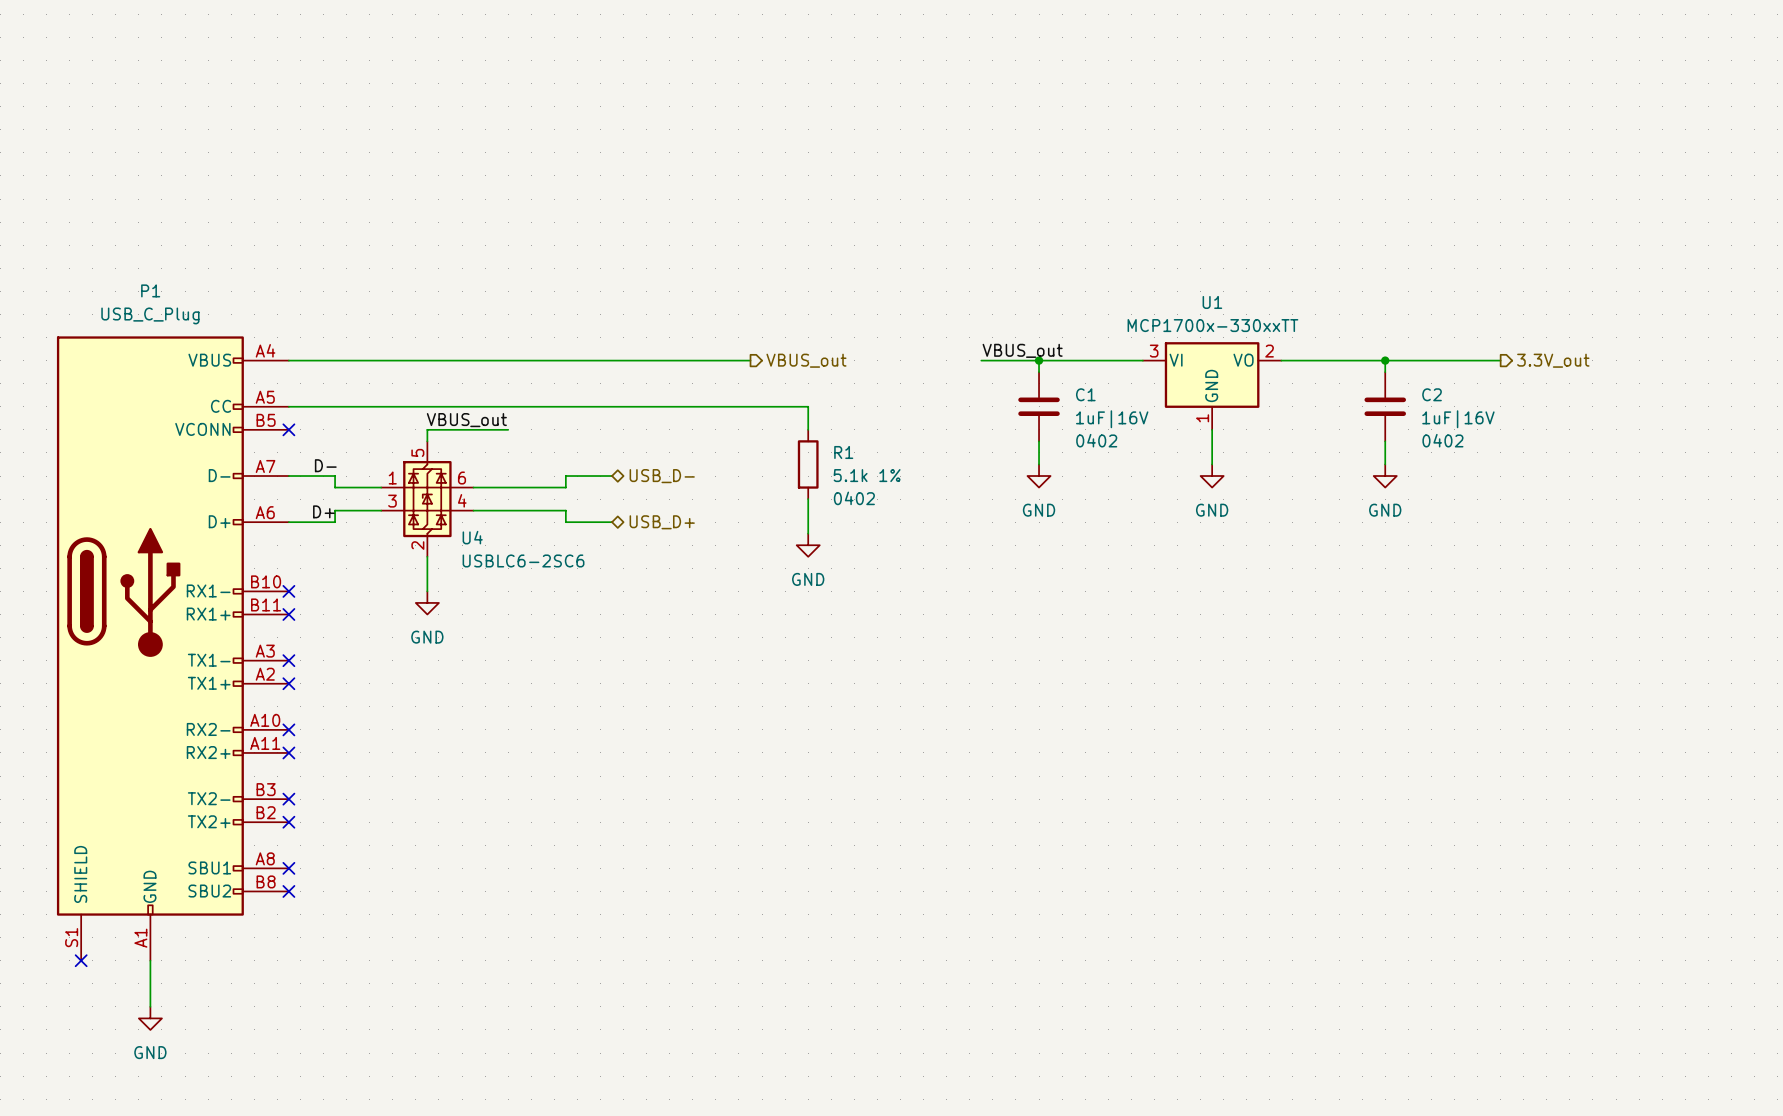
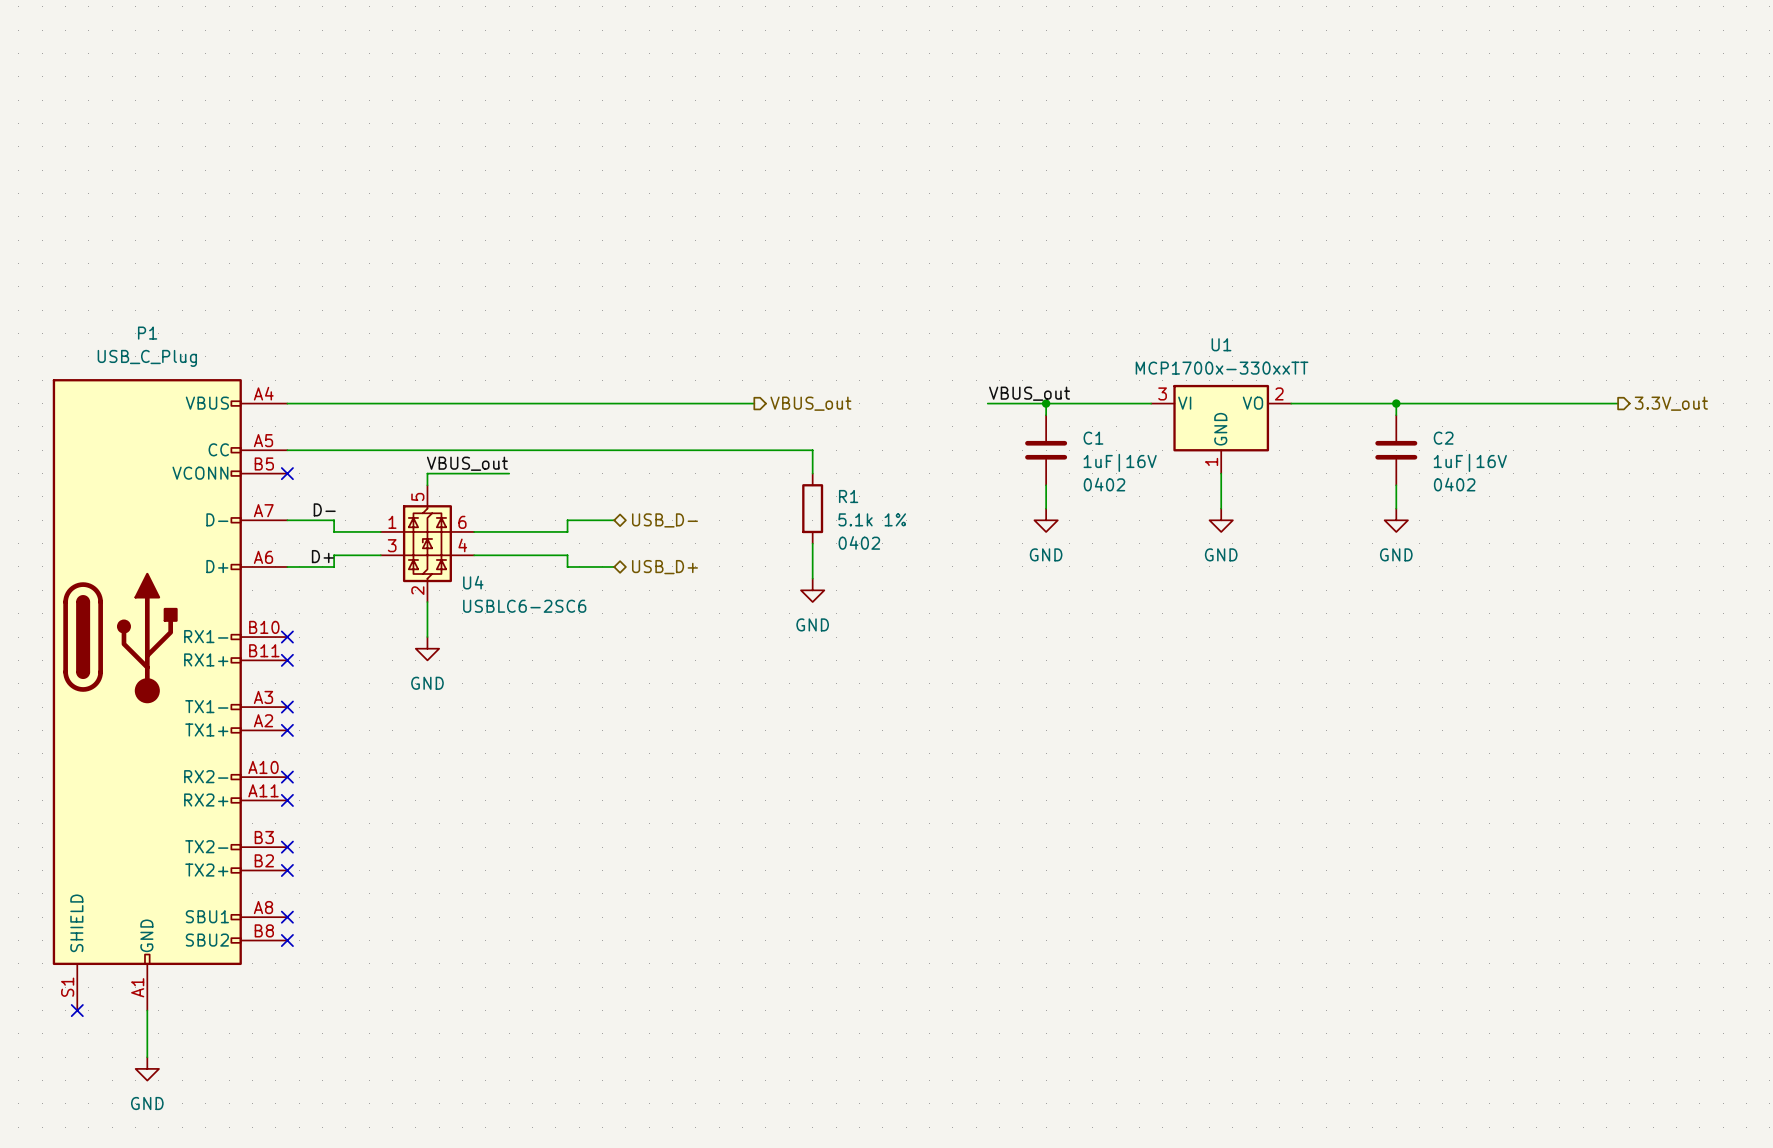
wire: none -> (1513, 403) (1618, 403)
hierarchical label position: 3.3V_out (1553, 360) -> 3.3V_out (1671, 403)

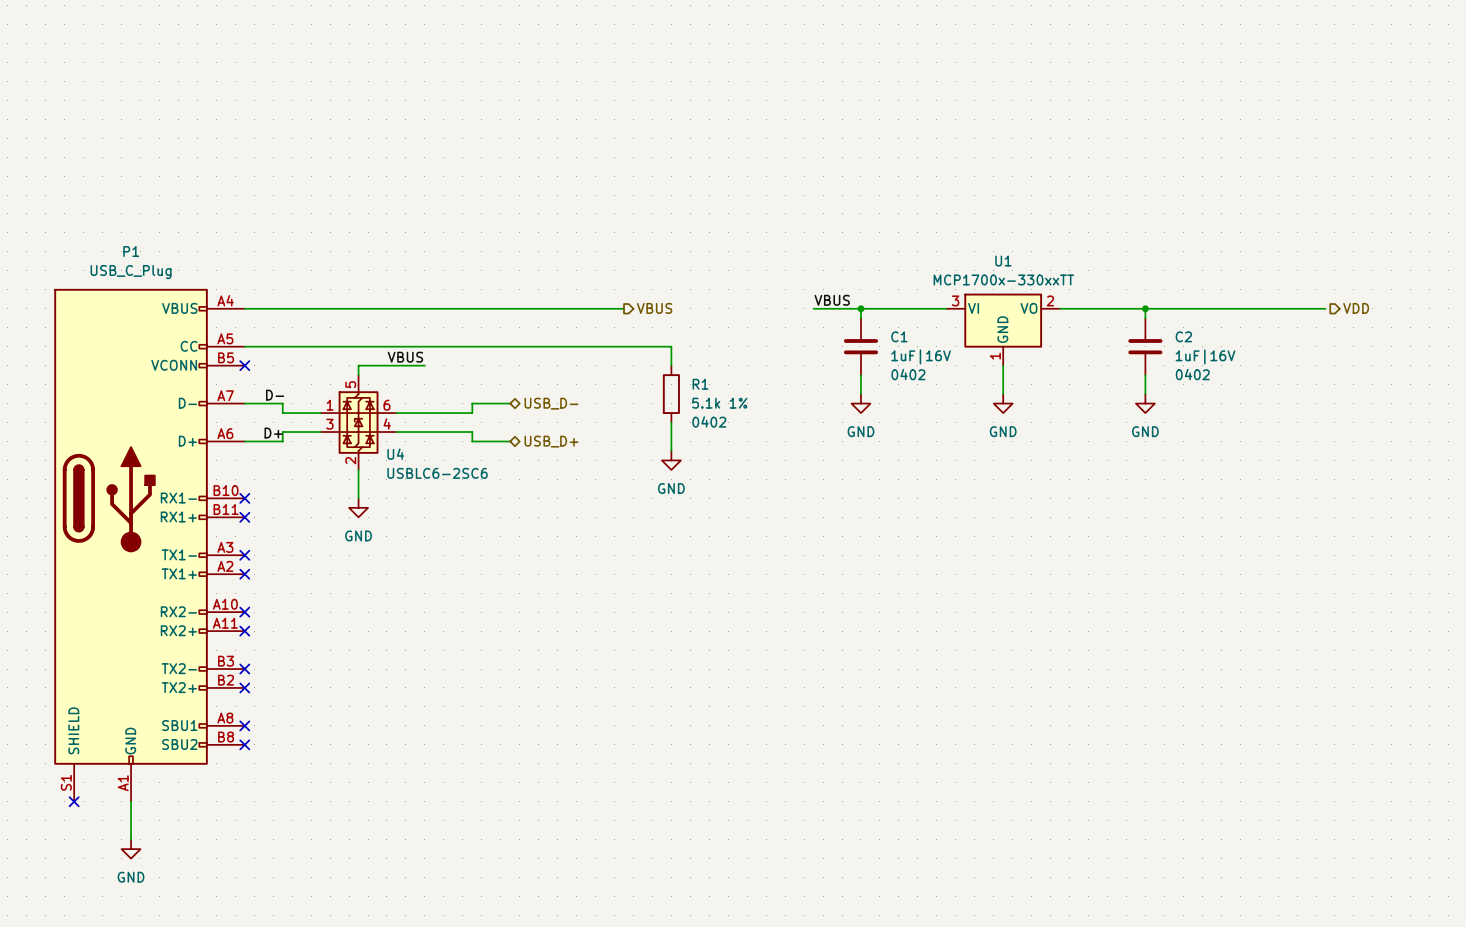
label: VBUS_out (1029, 393) -> VBUS (832, 300)
hierarchical label: VBUS_out (810, 403) -> VBUS (654, 308)
hierarchical label: 3.3V_out (1671, 403) -> VDD (1356, 308)
label: VBUS_out (467, 463) -> VBUS (405, 357)

